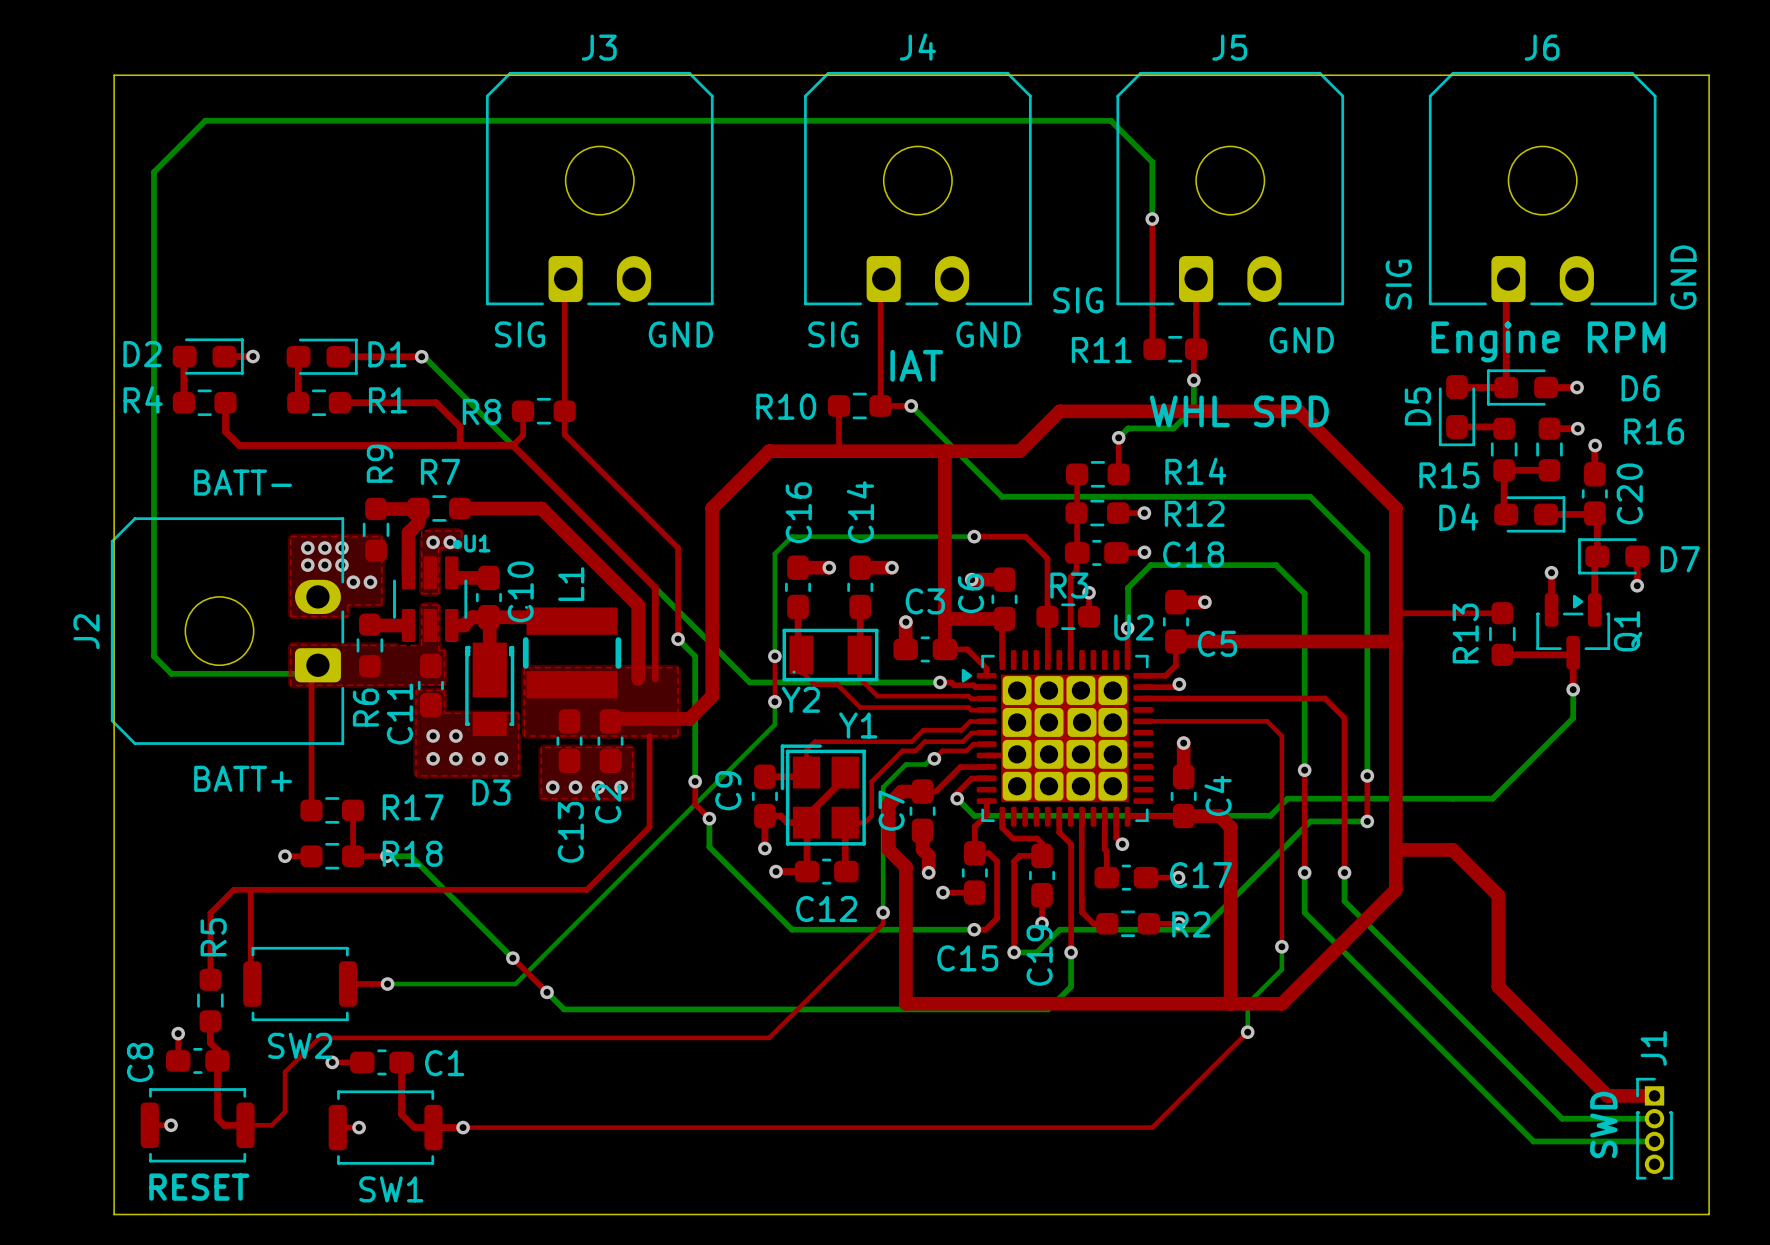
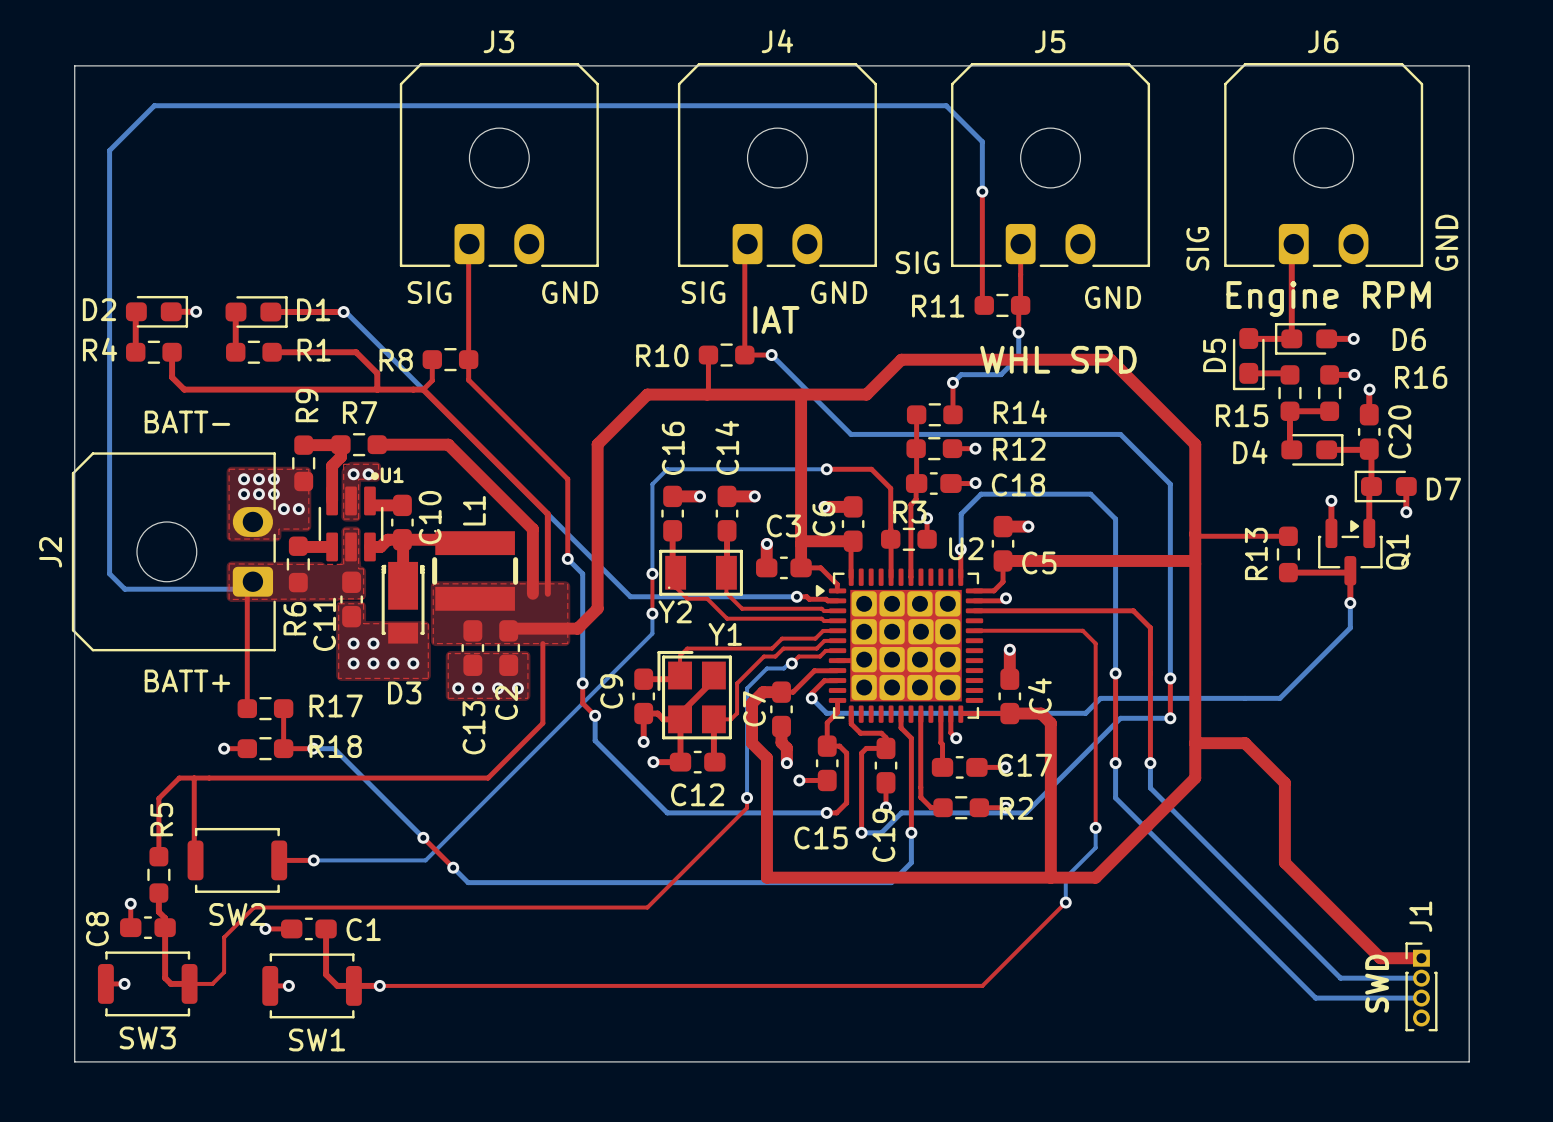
RESET name: RESET (199, 1187) -> SW3 (147, 1037)

